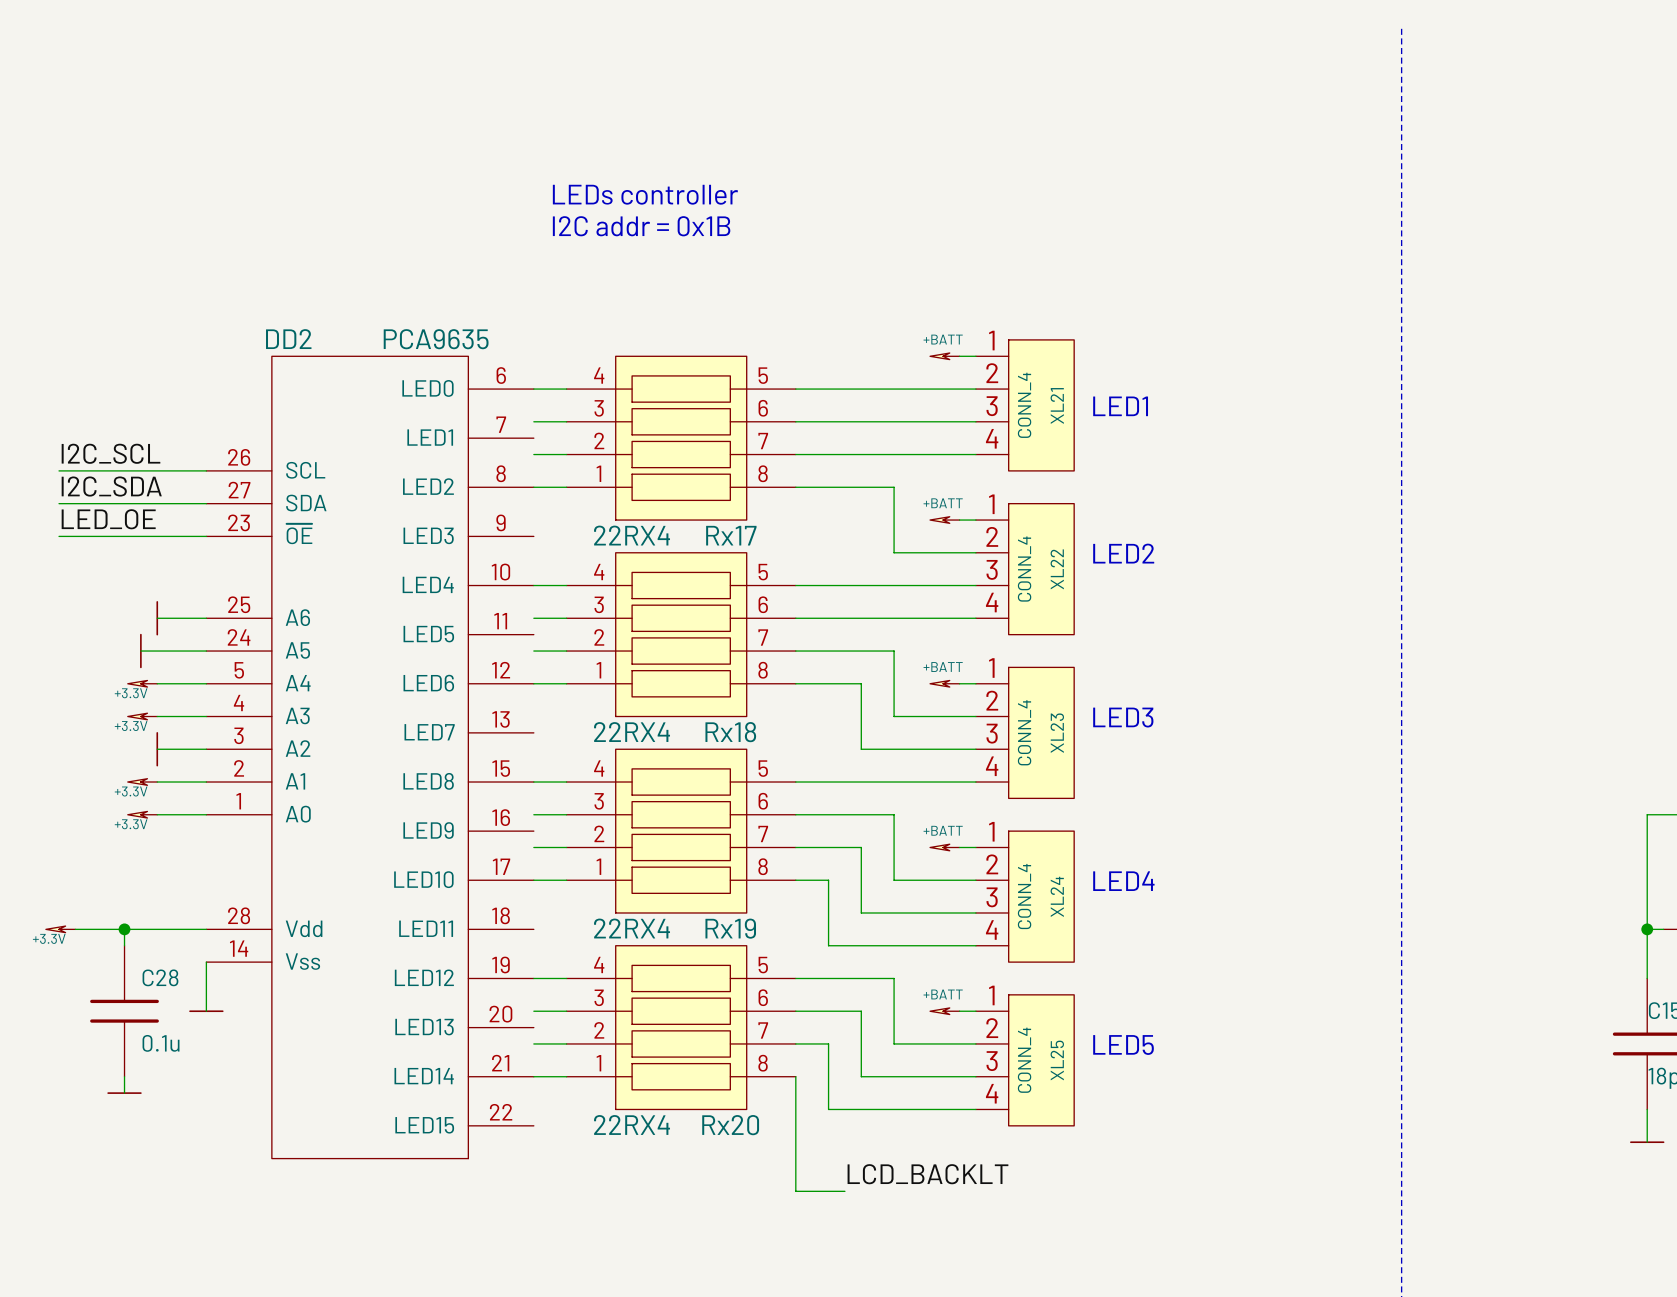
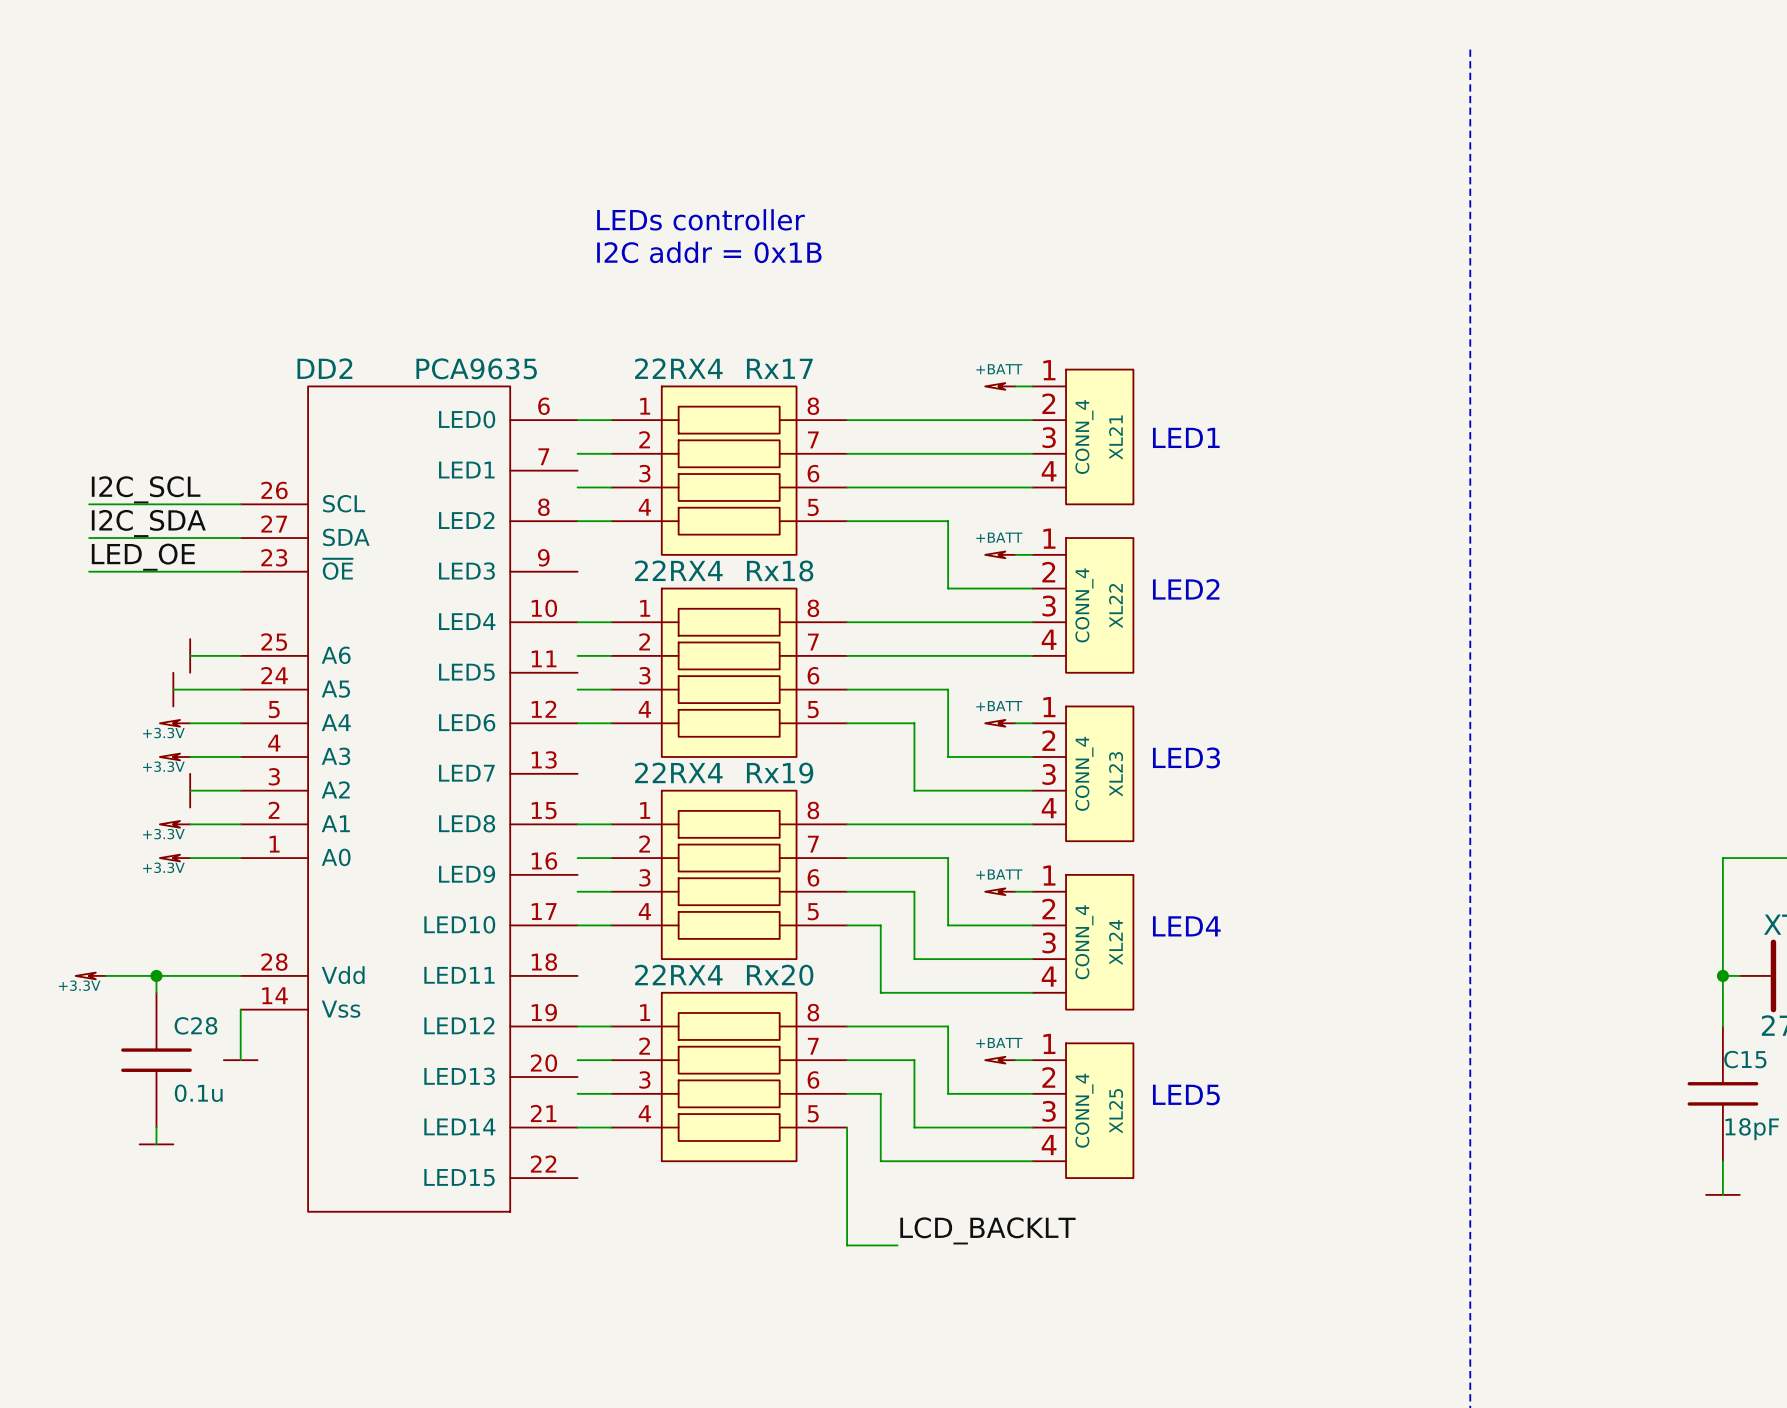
Rx17 flip: as is (681, 438) -> up-down (729, 470)
Rx18 flip: as is (681, 634) -> up-down (729, 672)
Rx19 flip: as is (681, 831) -> up-down (729, 874)
Rx20 flip: as is (681, 1027) -> up-down (729, 1077)

